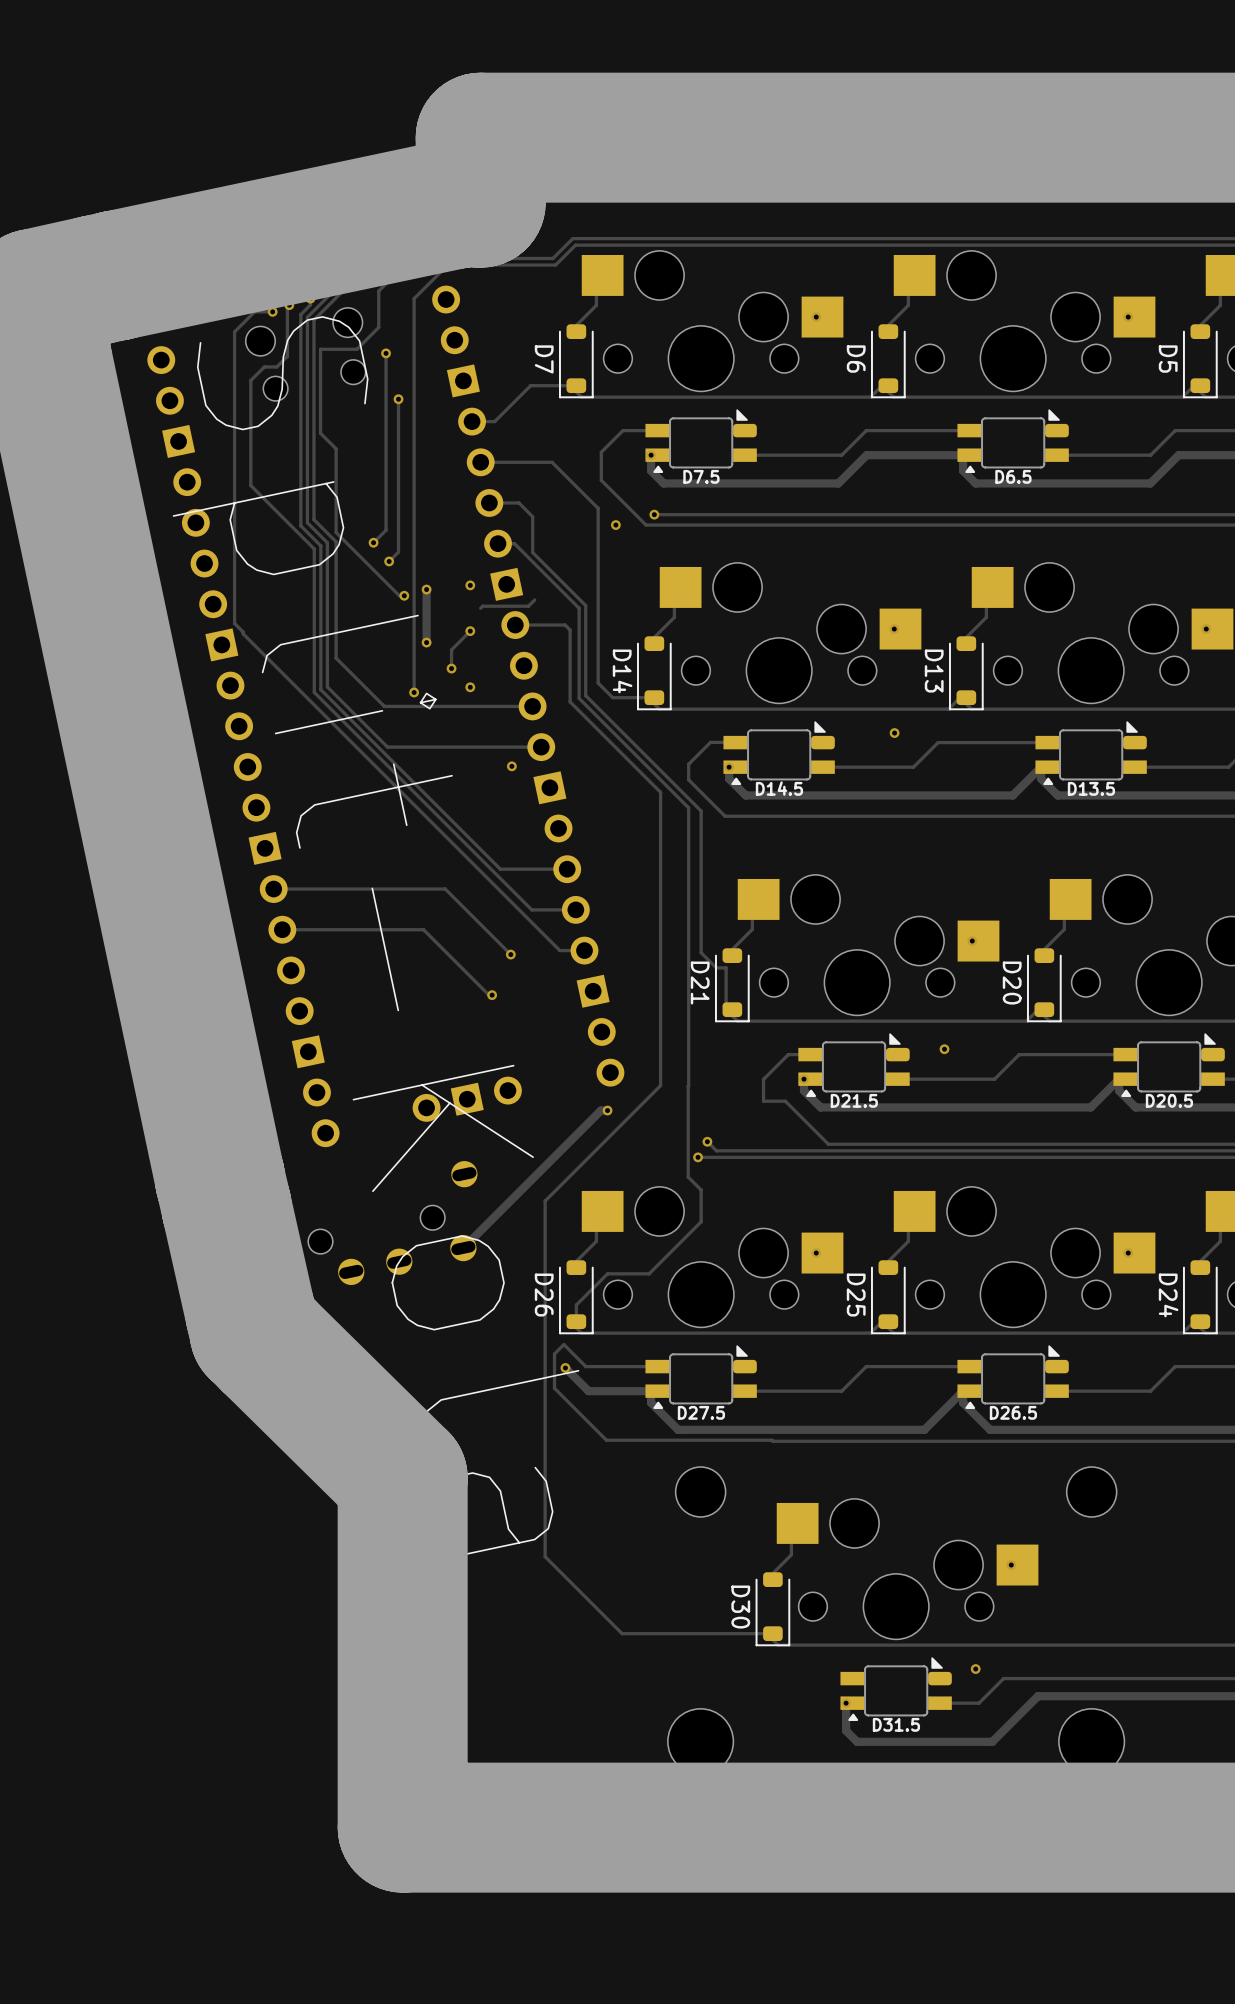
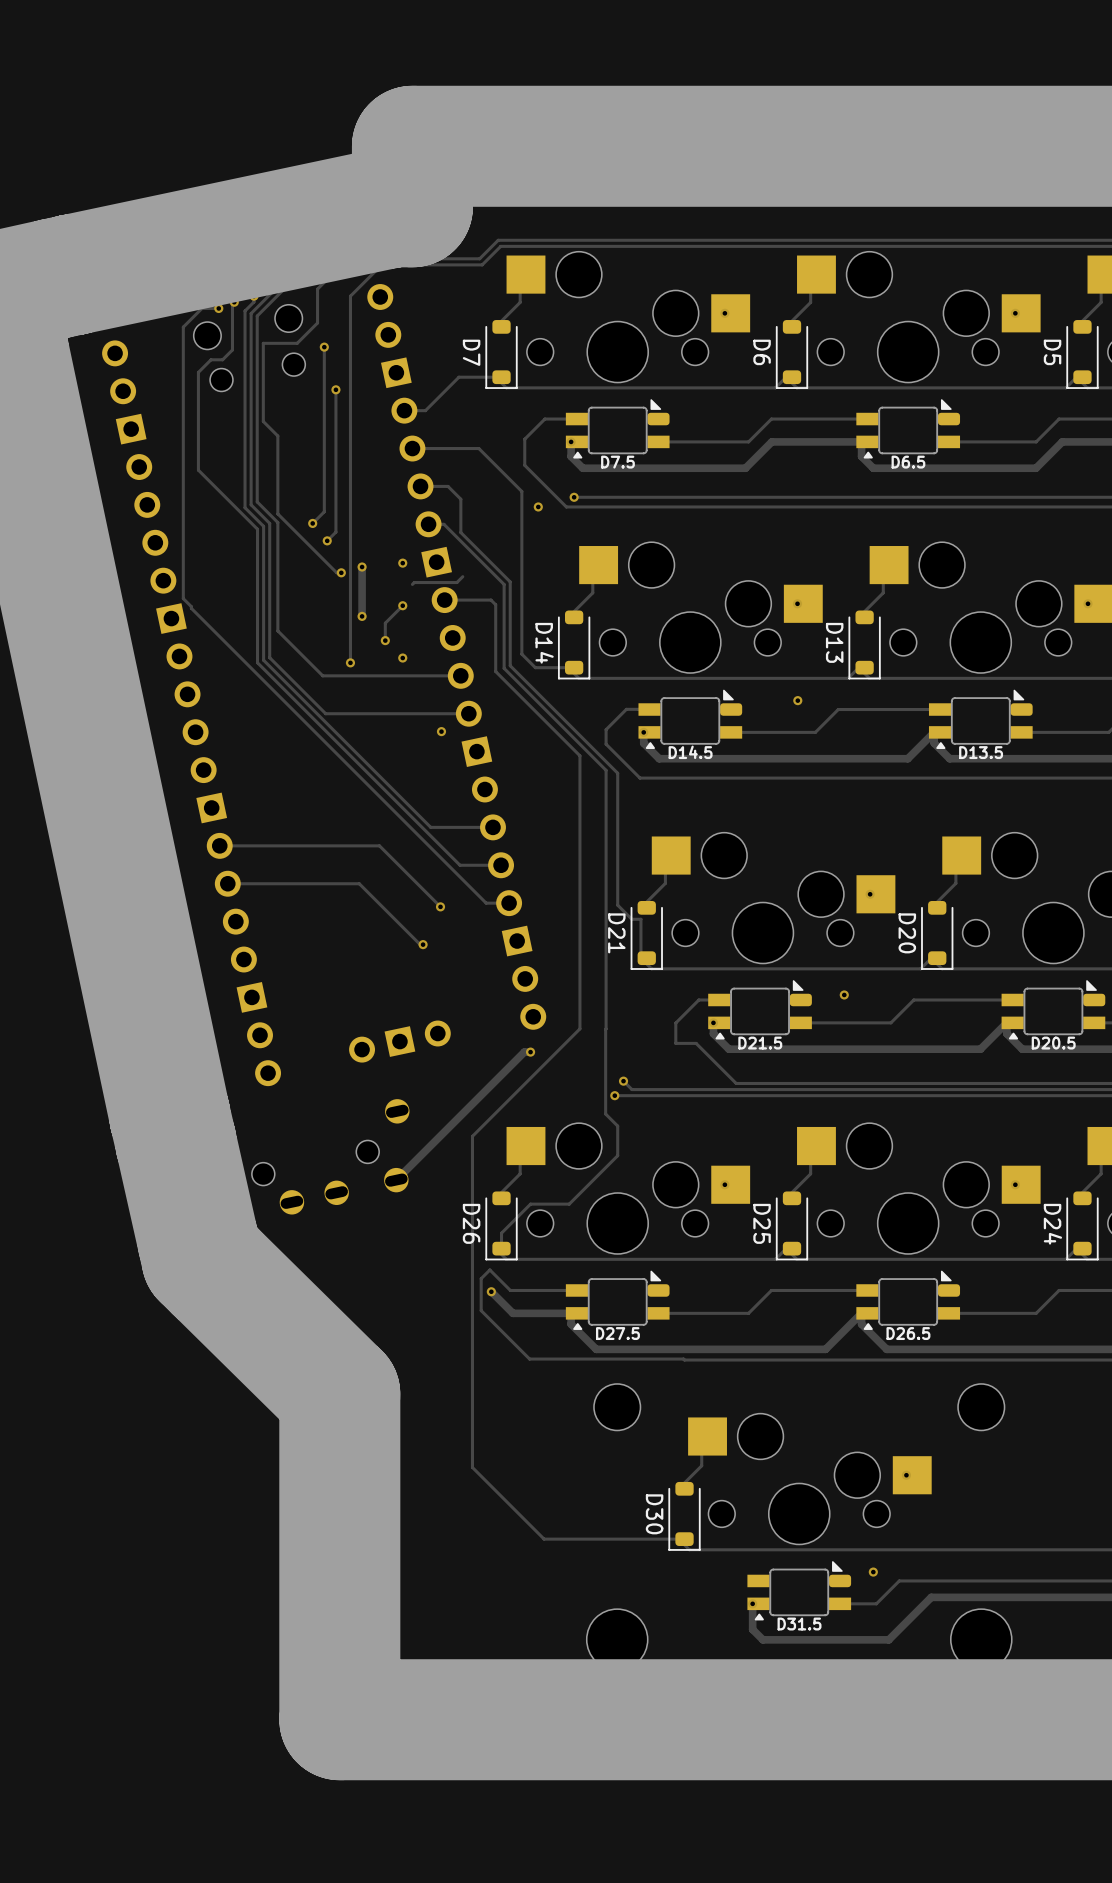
text: Split-Kola (376, 937) -> none

